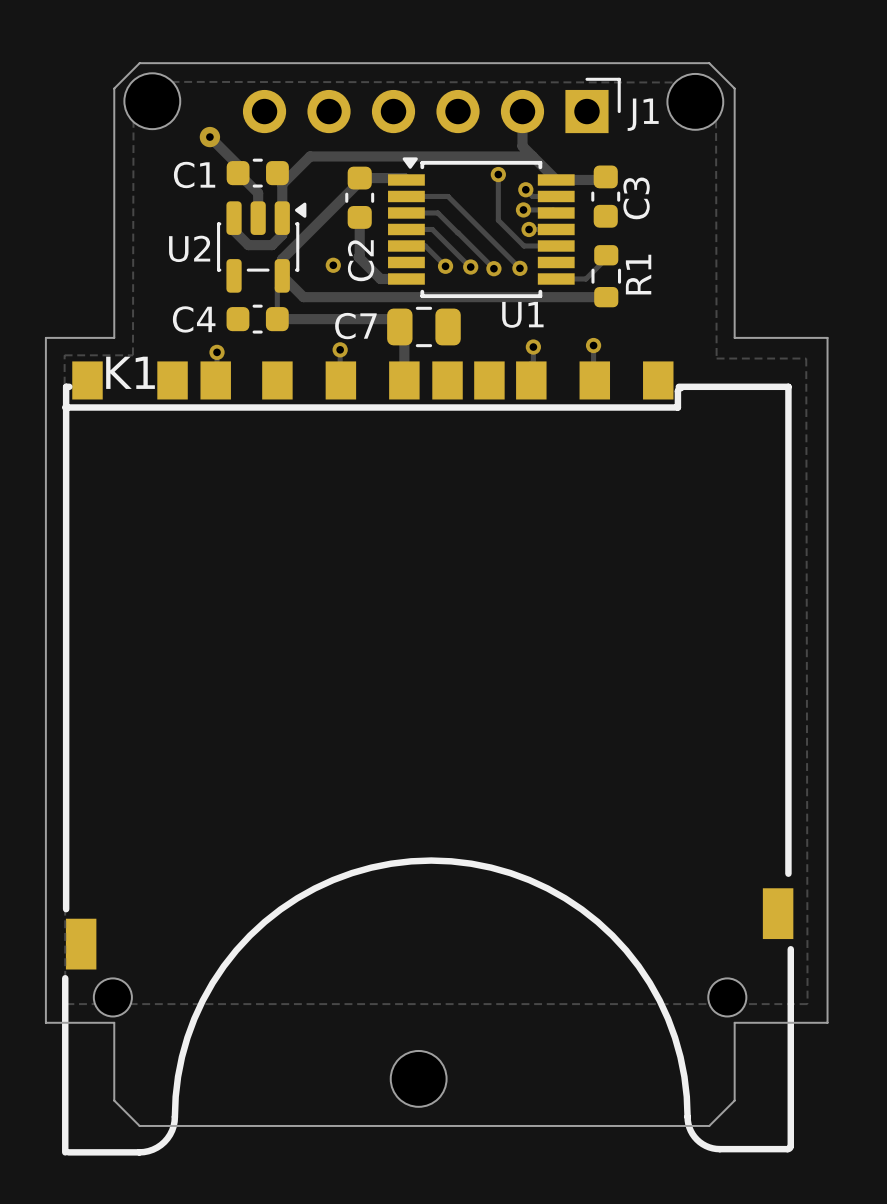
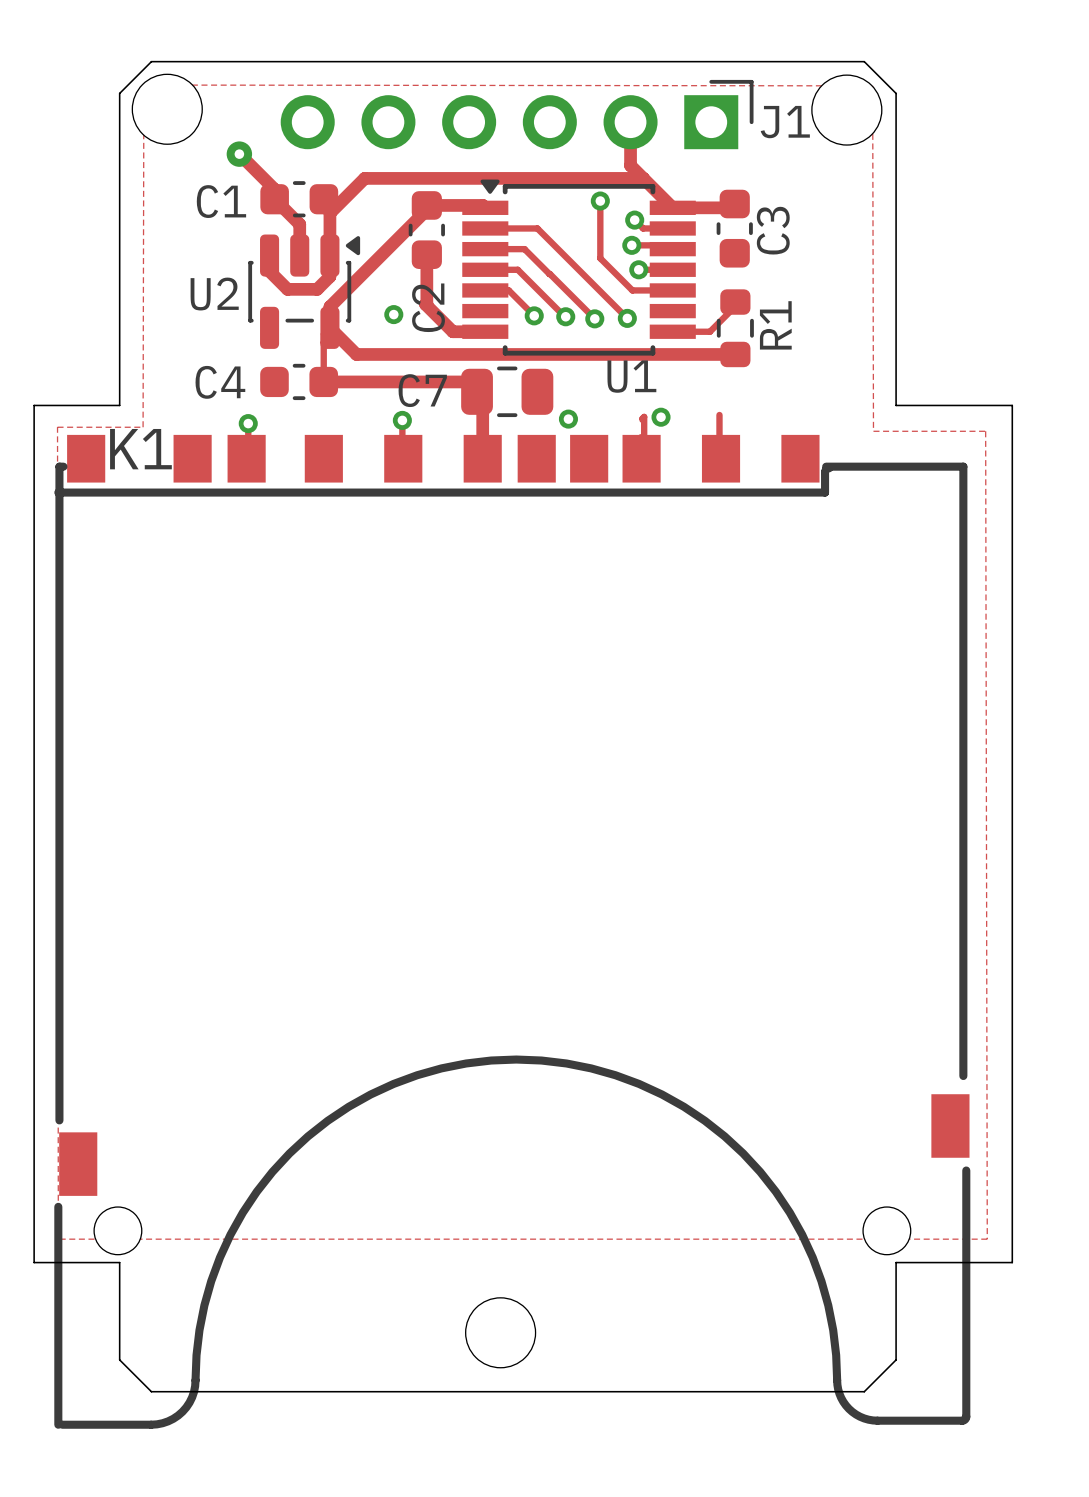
via: (593, 345) -> none
via position: (533, 347) -> (661, 417)
via: none -> (568, 419)

